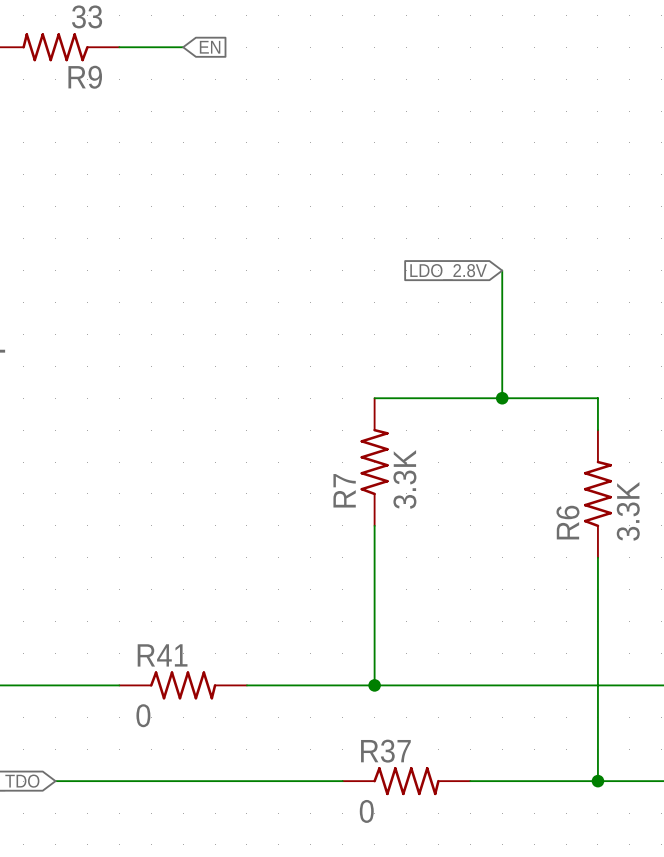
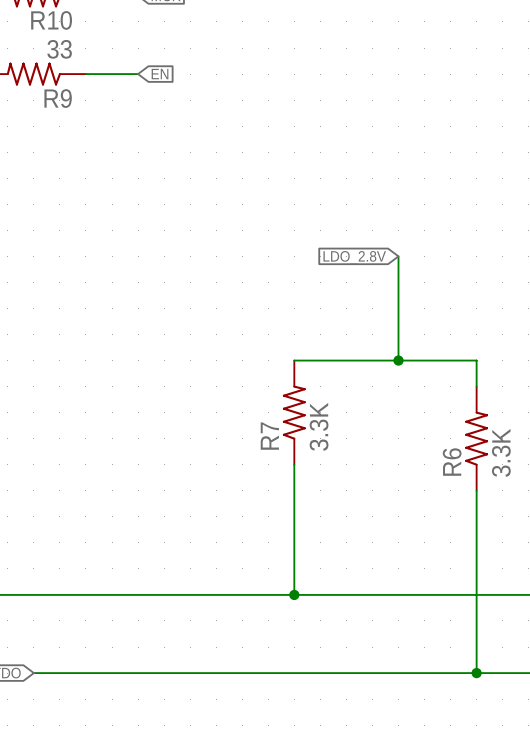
R41: 0 (183, 685) -> none
R37: 0 (406, 781) -> none

